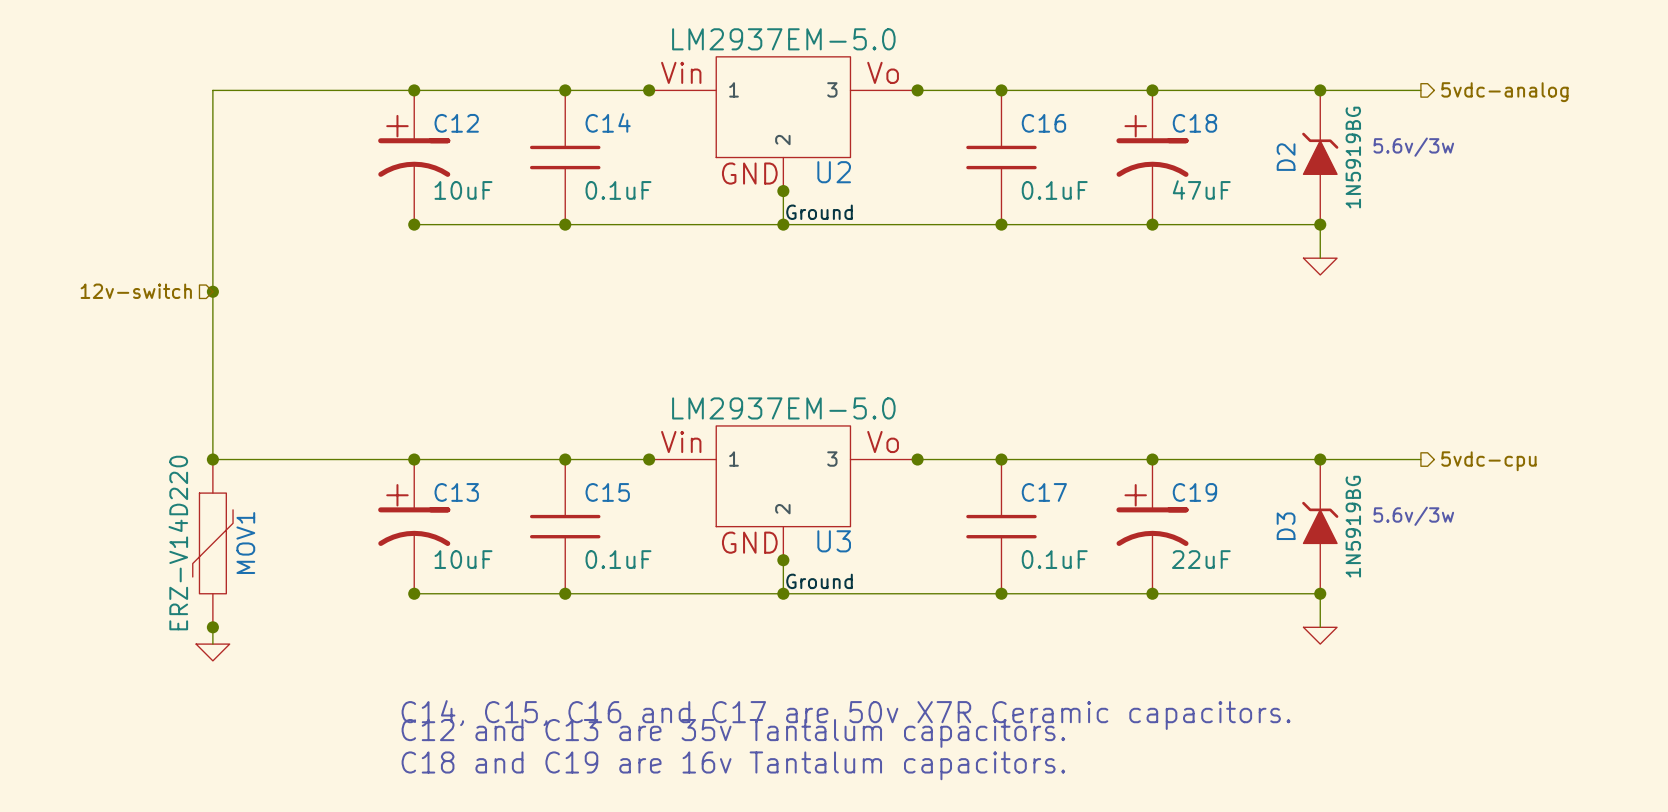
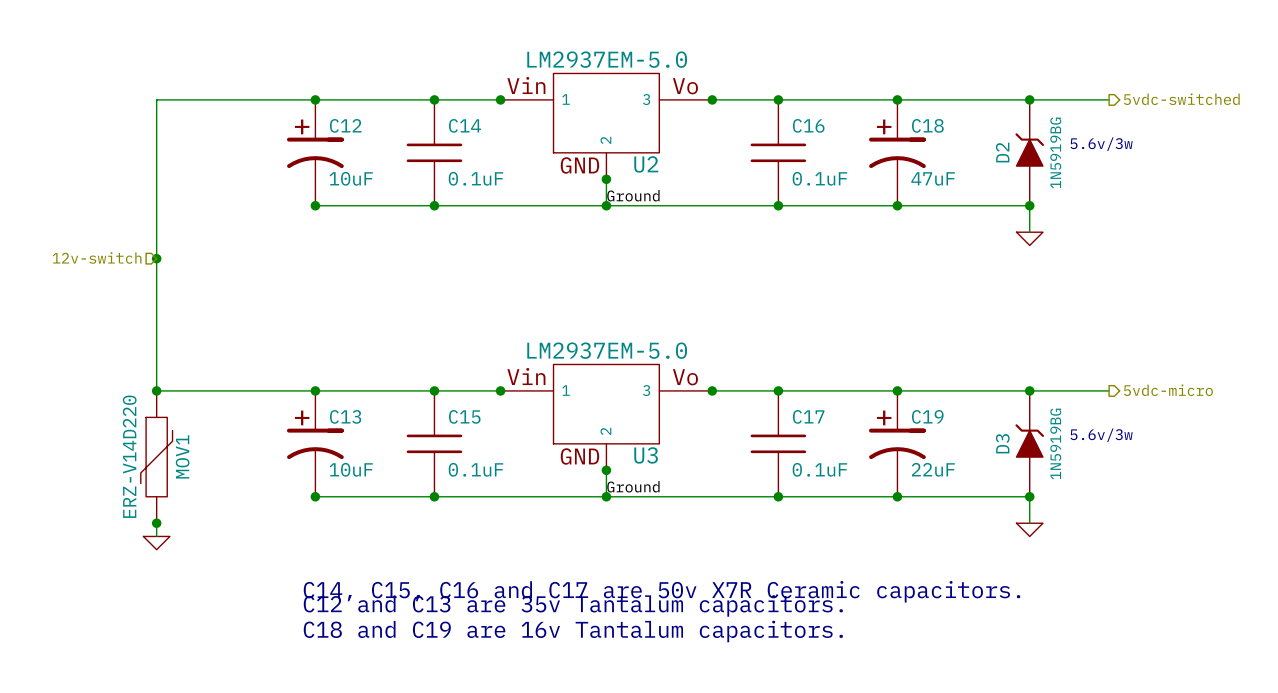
hierarchical label: 5vdc-analog (1504, 92) -> 5vdc-switched (1181, 99)
hierarchical label: 5vdc-cpu (1488, 461) -> 5vdc-micro (1168, 390)

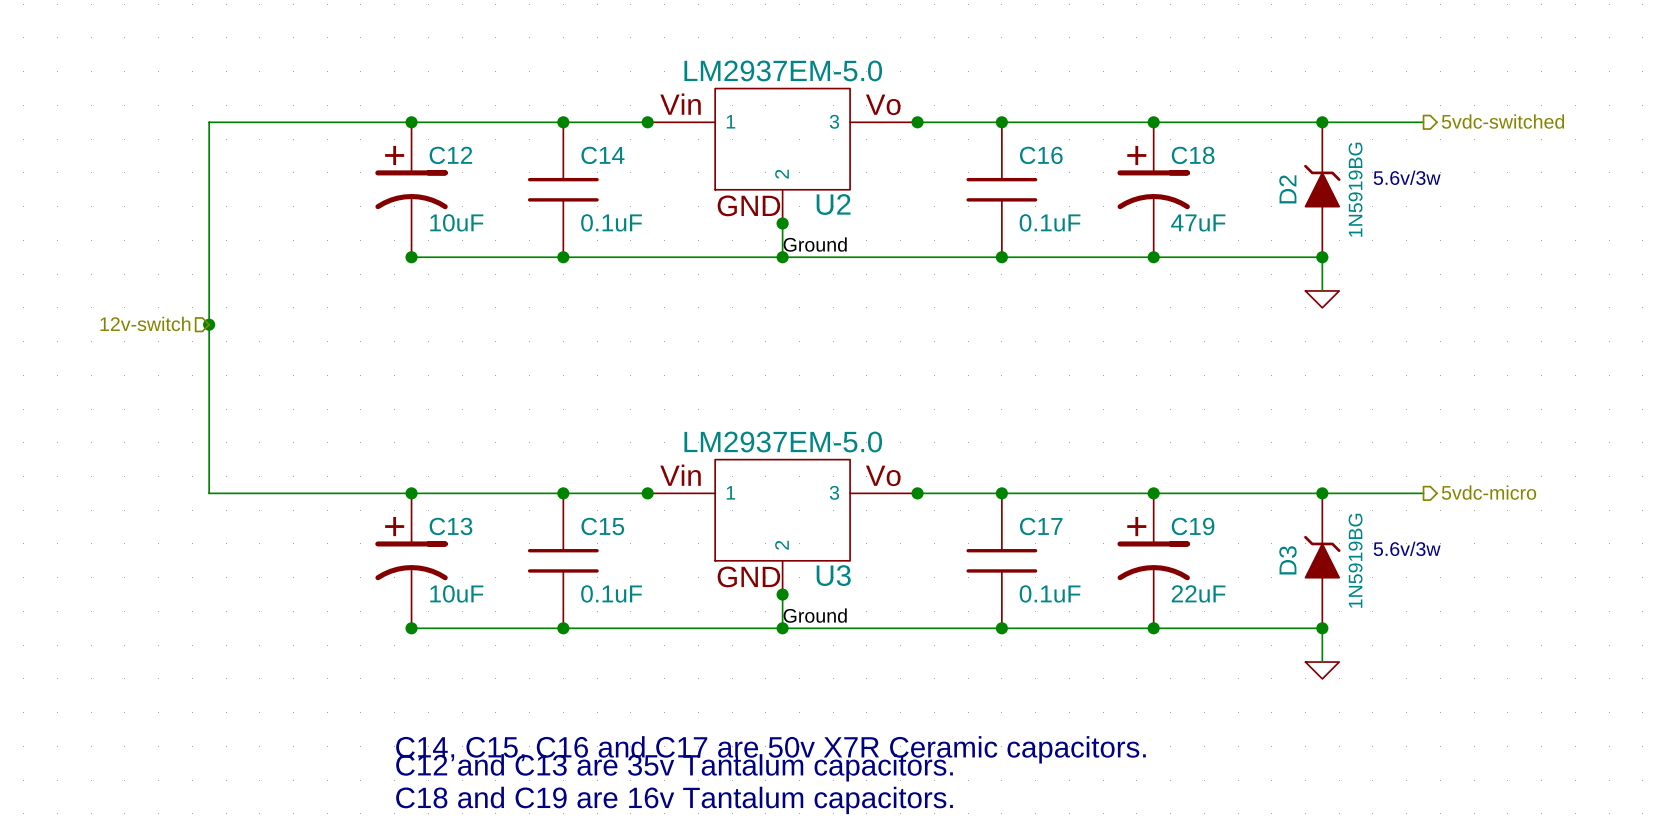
junction: (156, 390) -> none
MOV1: ERZ-V14D220 (156, 457) -> none
wire: (156, 523) (156, 536) -> none
junction: (156, 523) -> none
power symbol: (156, 543) -> none

